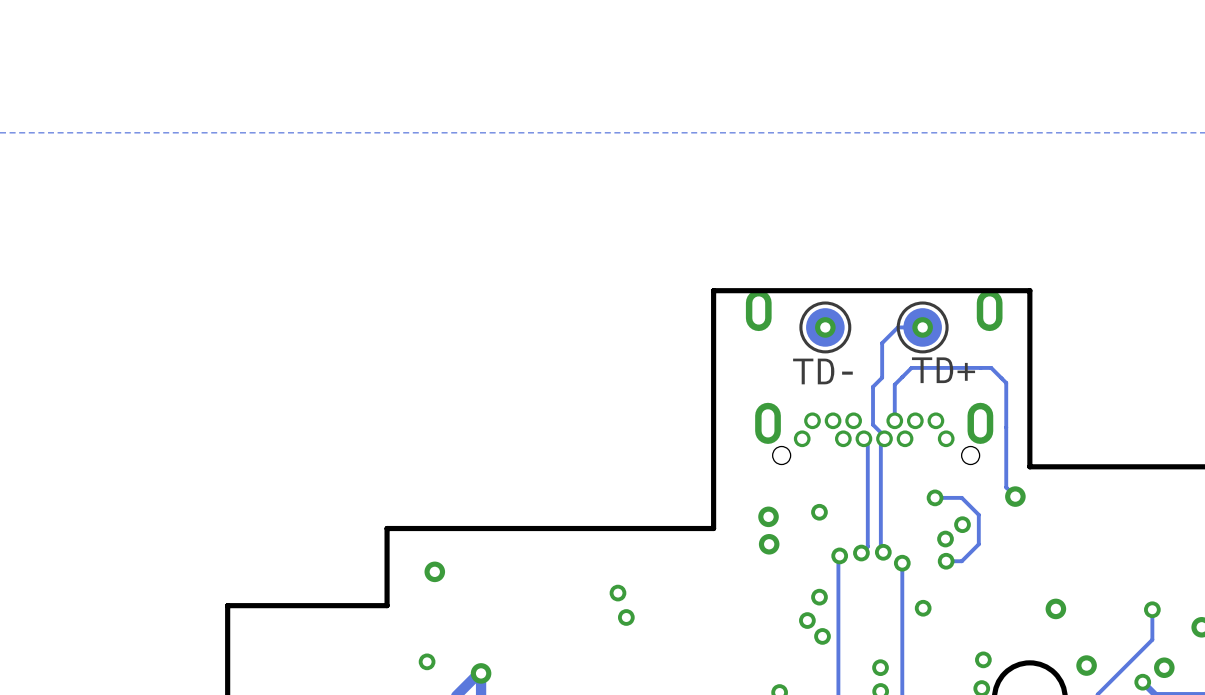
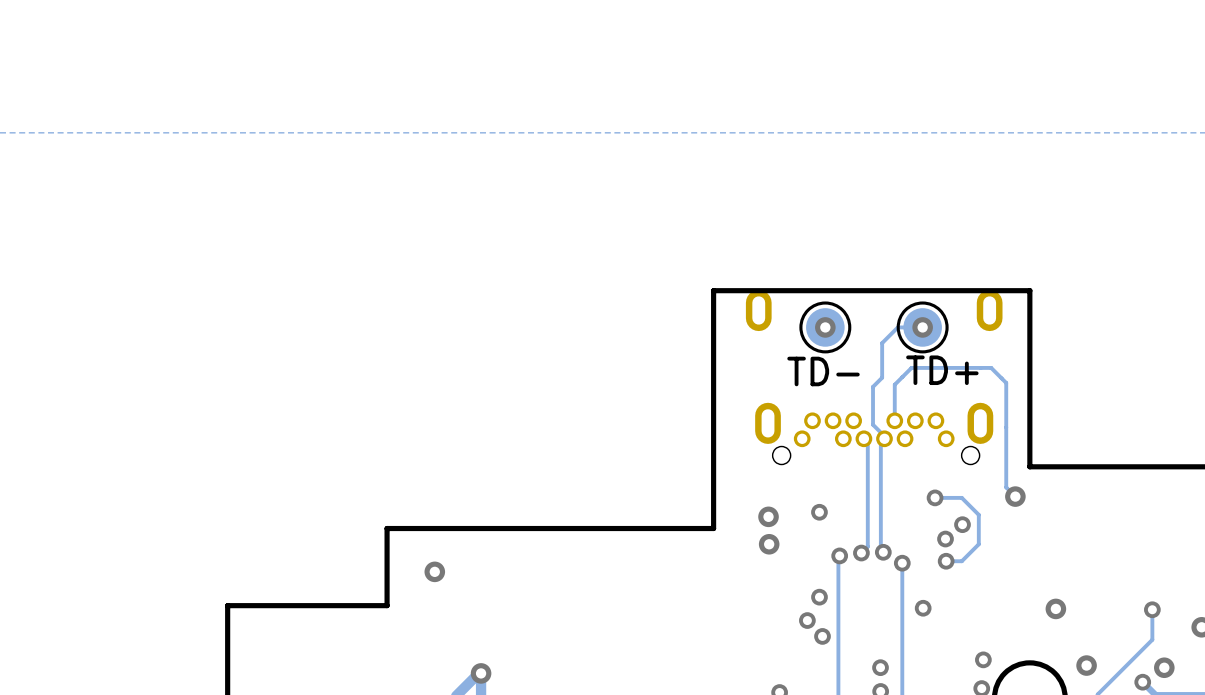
via: (617, 593) -> none
via: (626, 617) -> none
via: (427, 661) -> none

